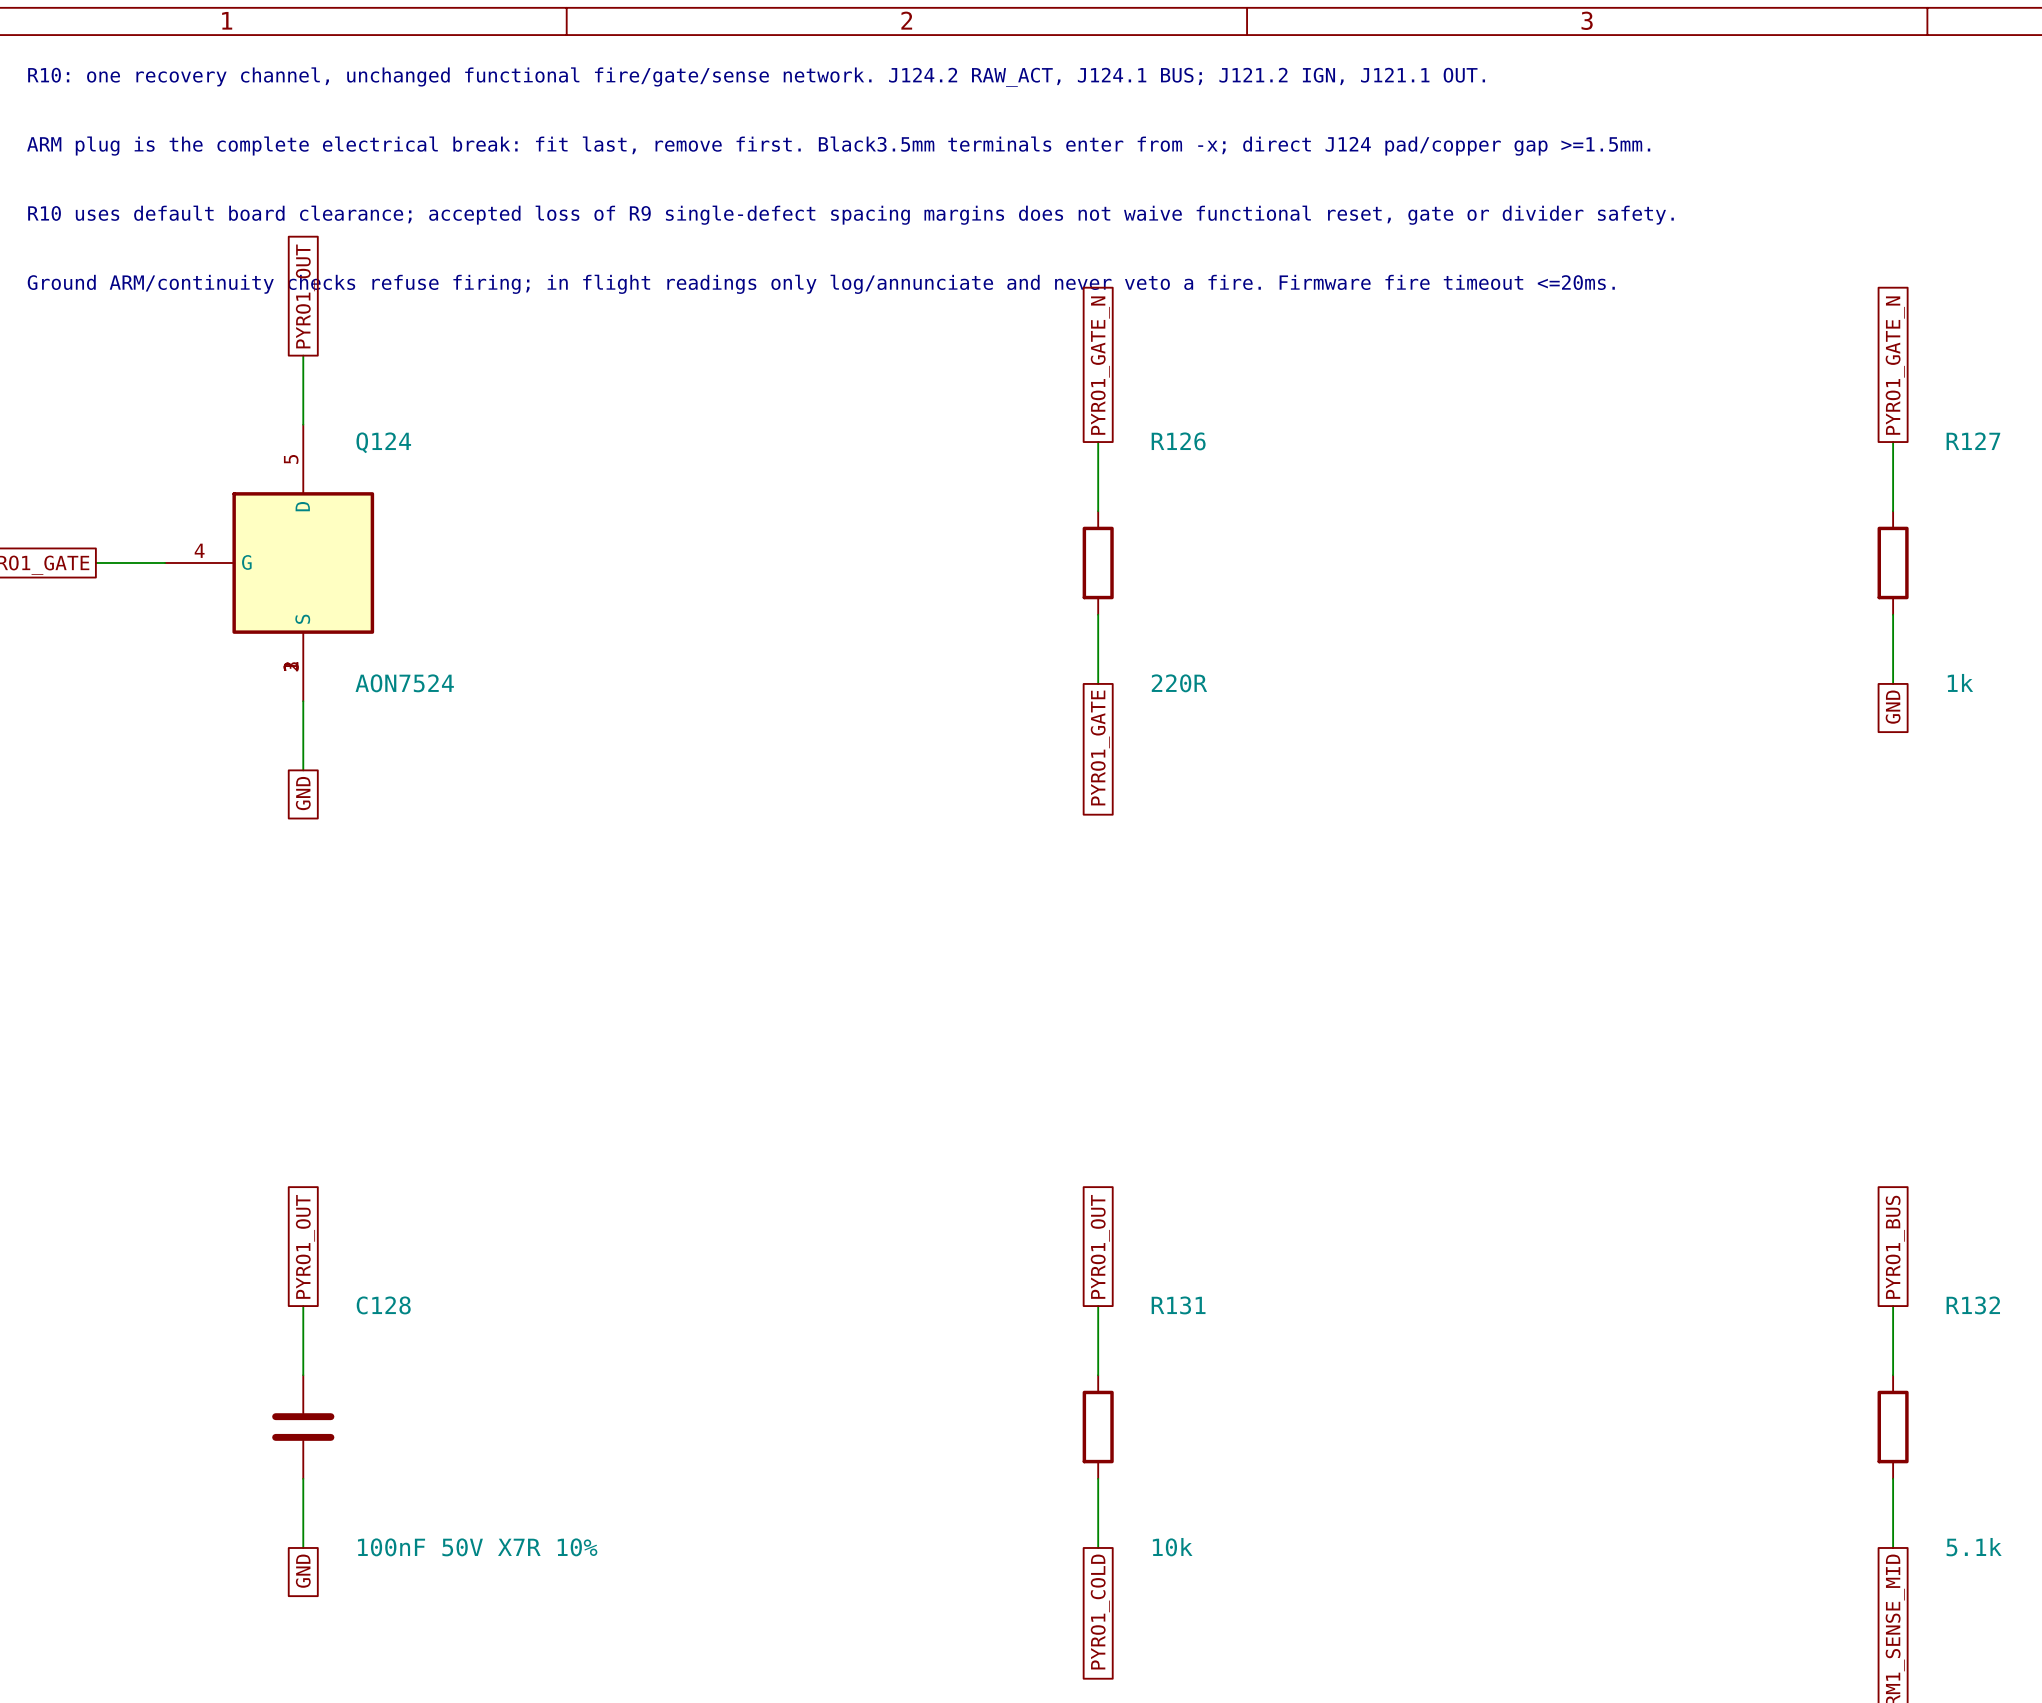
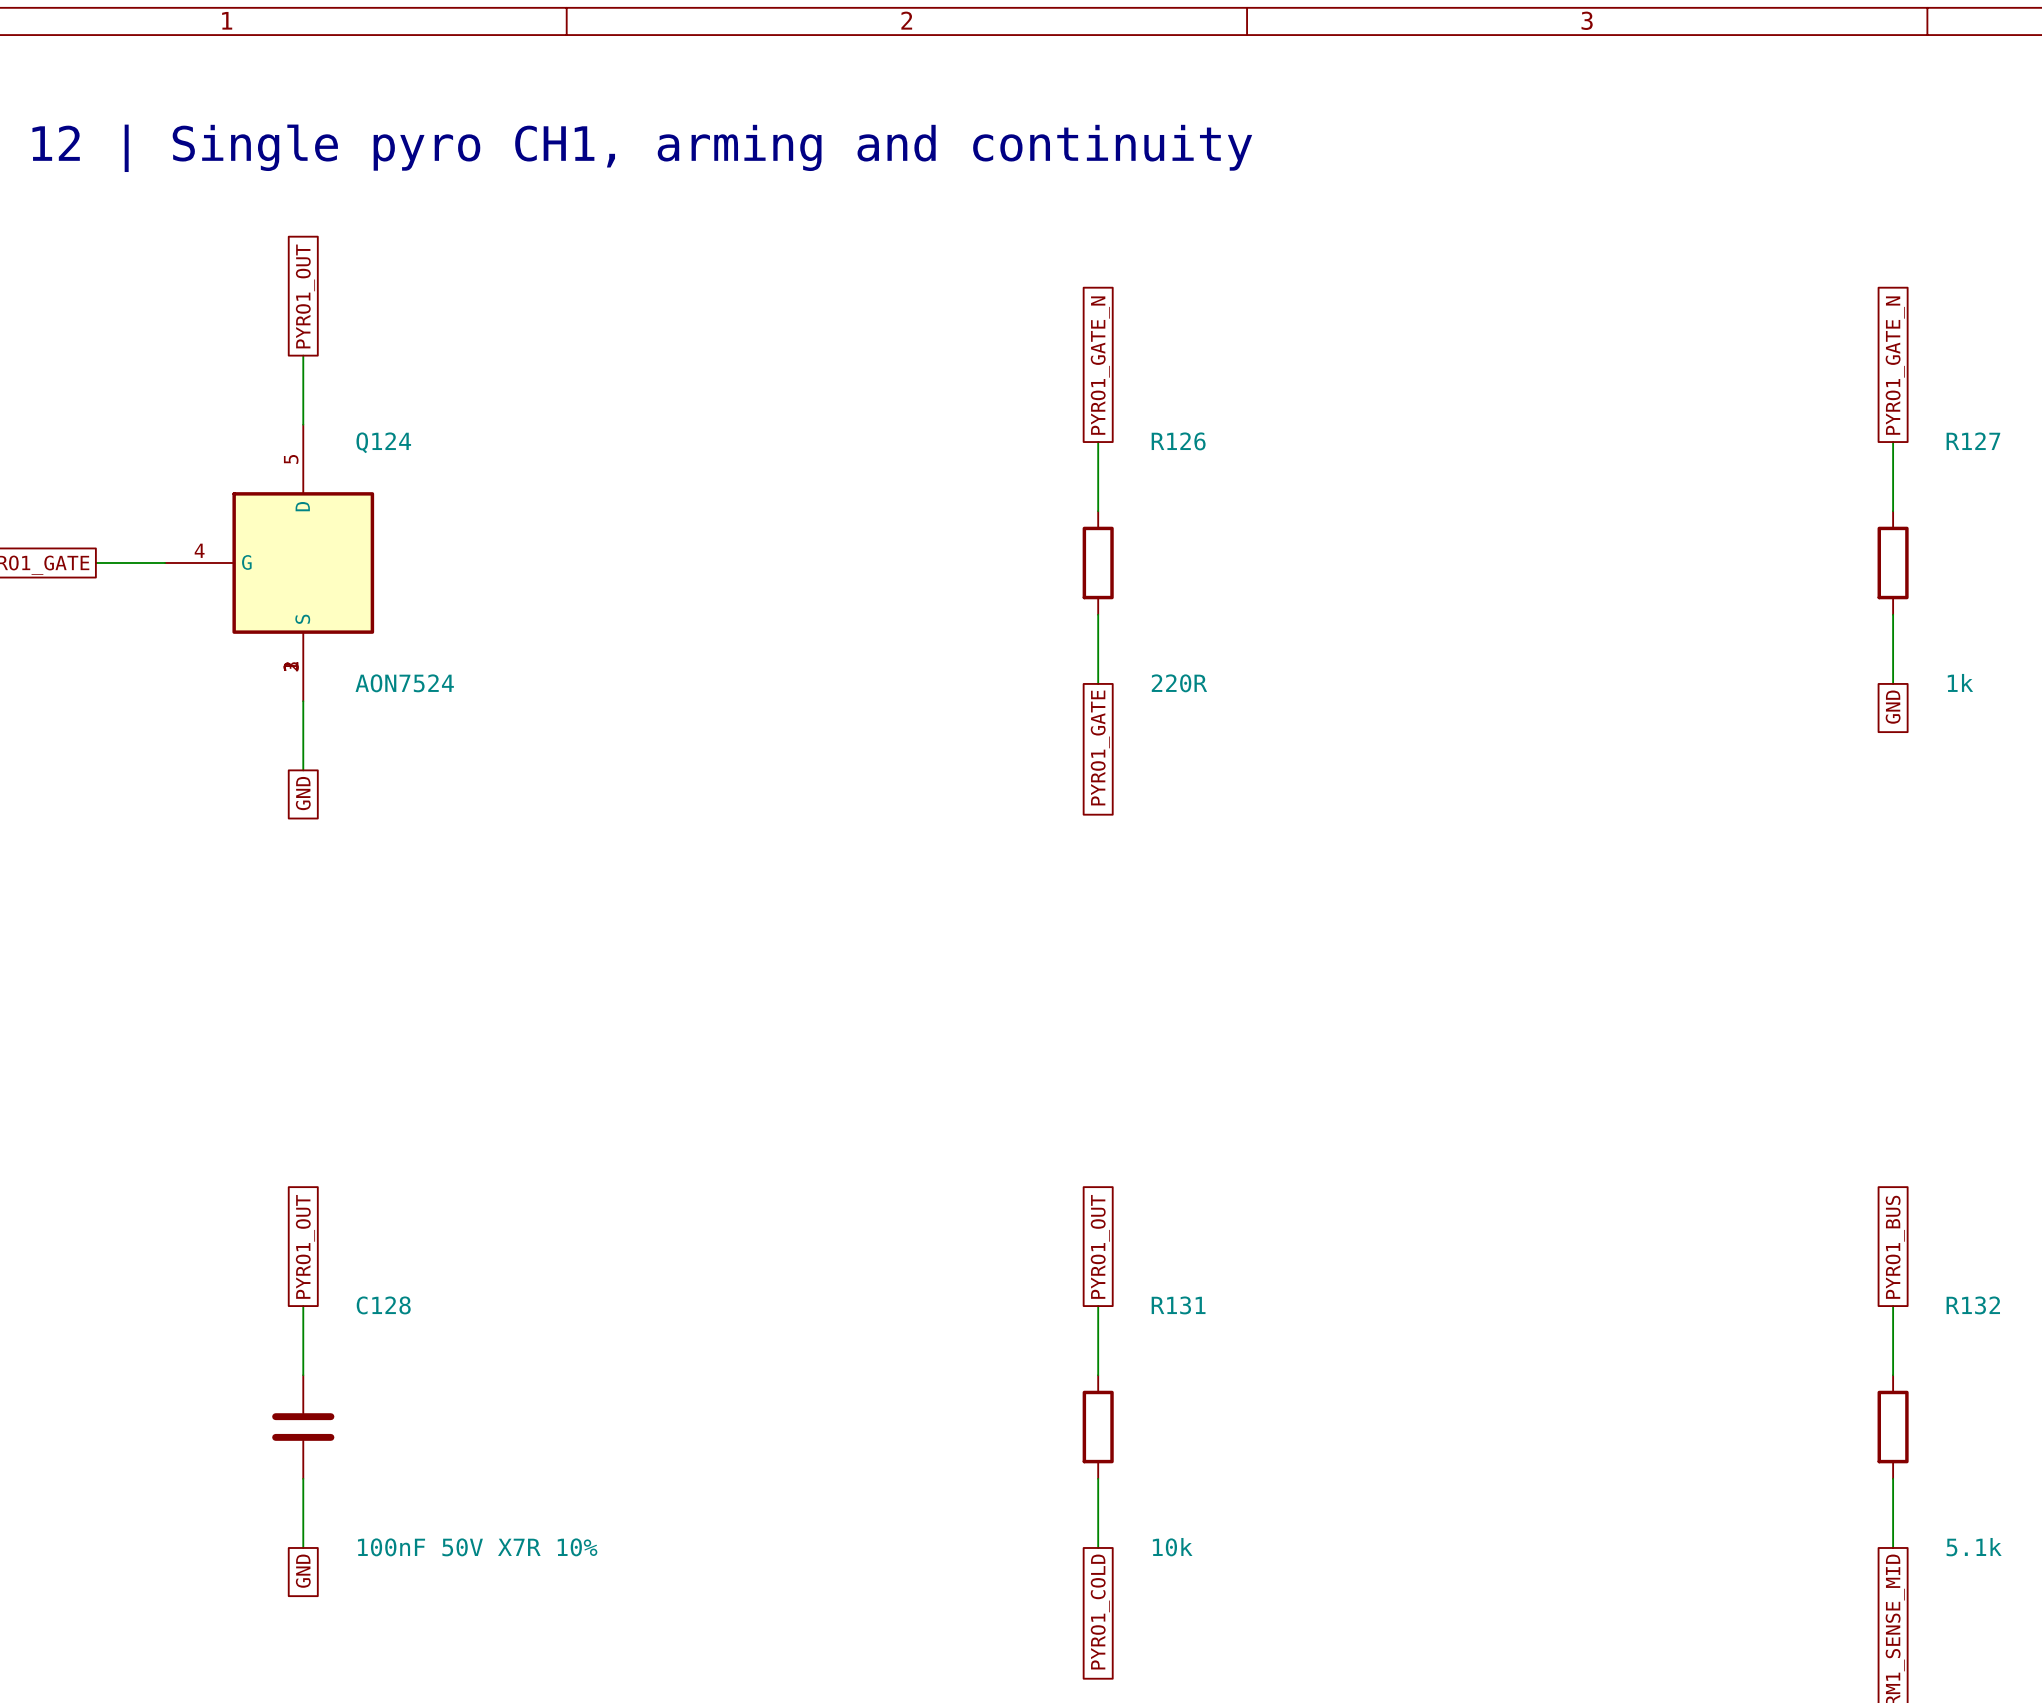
text: R10: one recovery channel, unchanged functional fire/gate/sense network. J124.2 RAW_ACT, J124.1 BUS; J121.2 IGN, J121.1 OUT. (756, 77) -> none
text: ARM plug is the complete electrical break: fit last, remove first. Black3.5mm terminals enter from -x; direct J124 pad/copper gap >=1.5mm. (838, 146) -> 12 | Single pyro CH1, arming and continuity (642, 148)
text: R10 uses default board clearance; accepted loss of R9 single-defect spacing margins does not waive functional reset, gate or divider safety. (850, 215) -> none
text: Ground ARM/continuity checks refuse firing; in flight readings only log/annunciate and never veto a fire. Firmware fire timeout <=20ms. (821, 284) -> none

